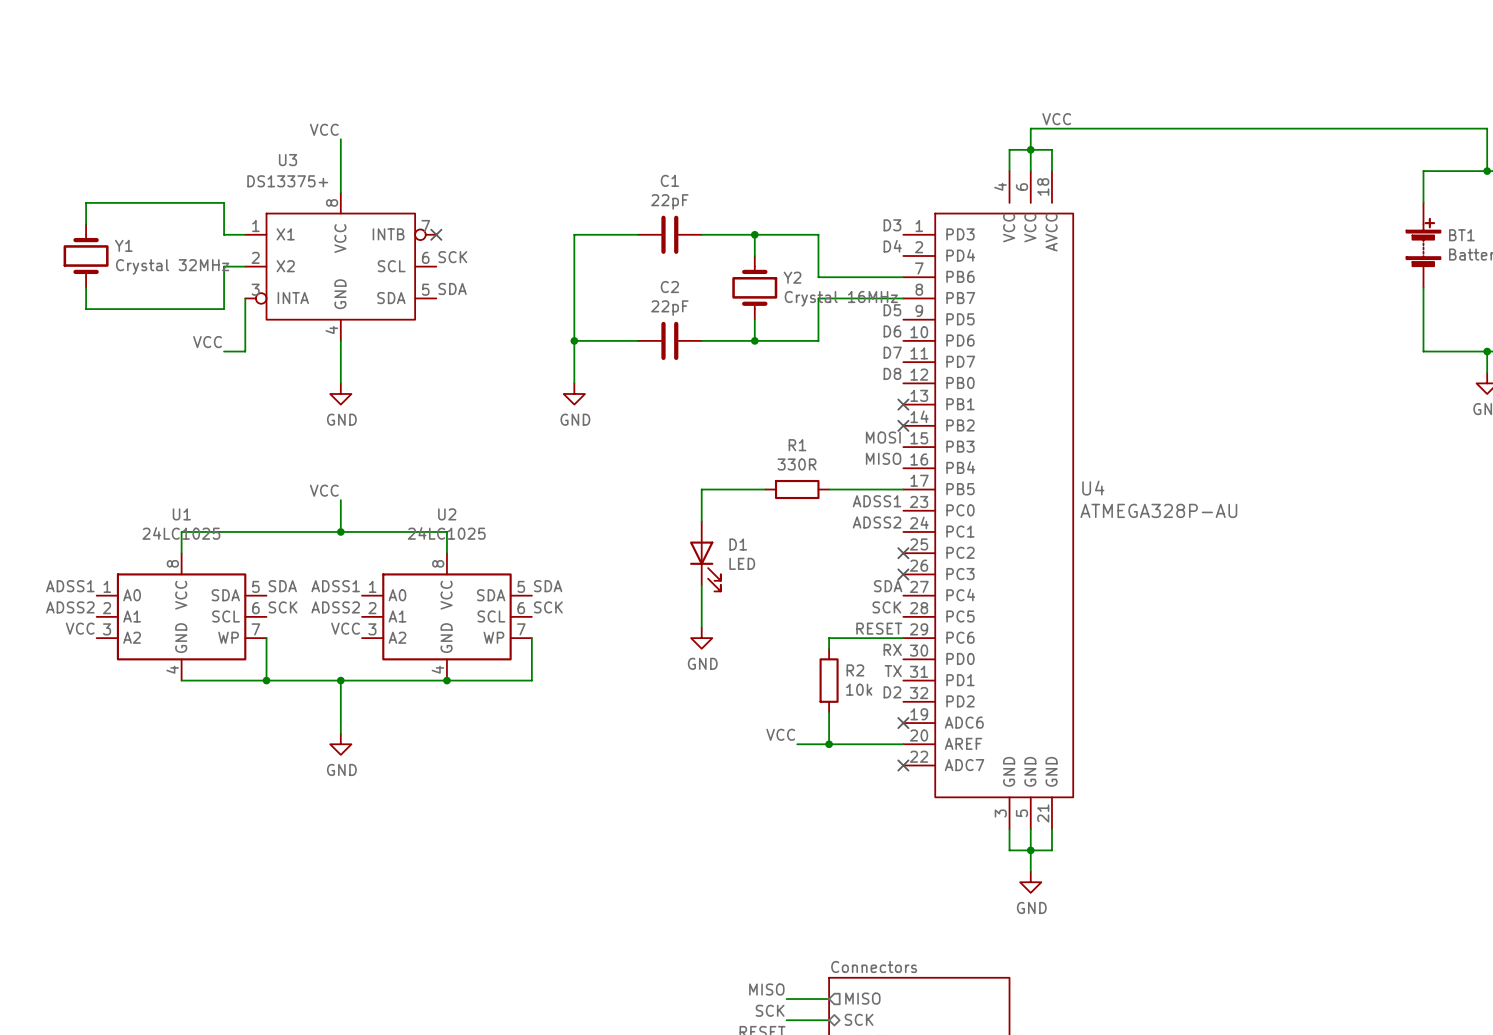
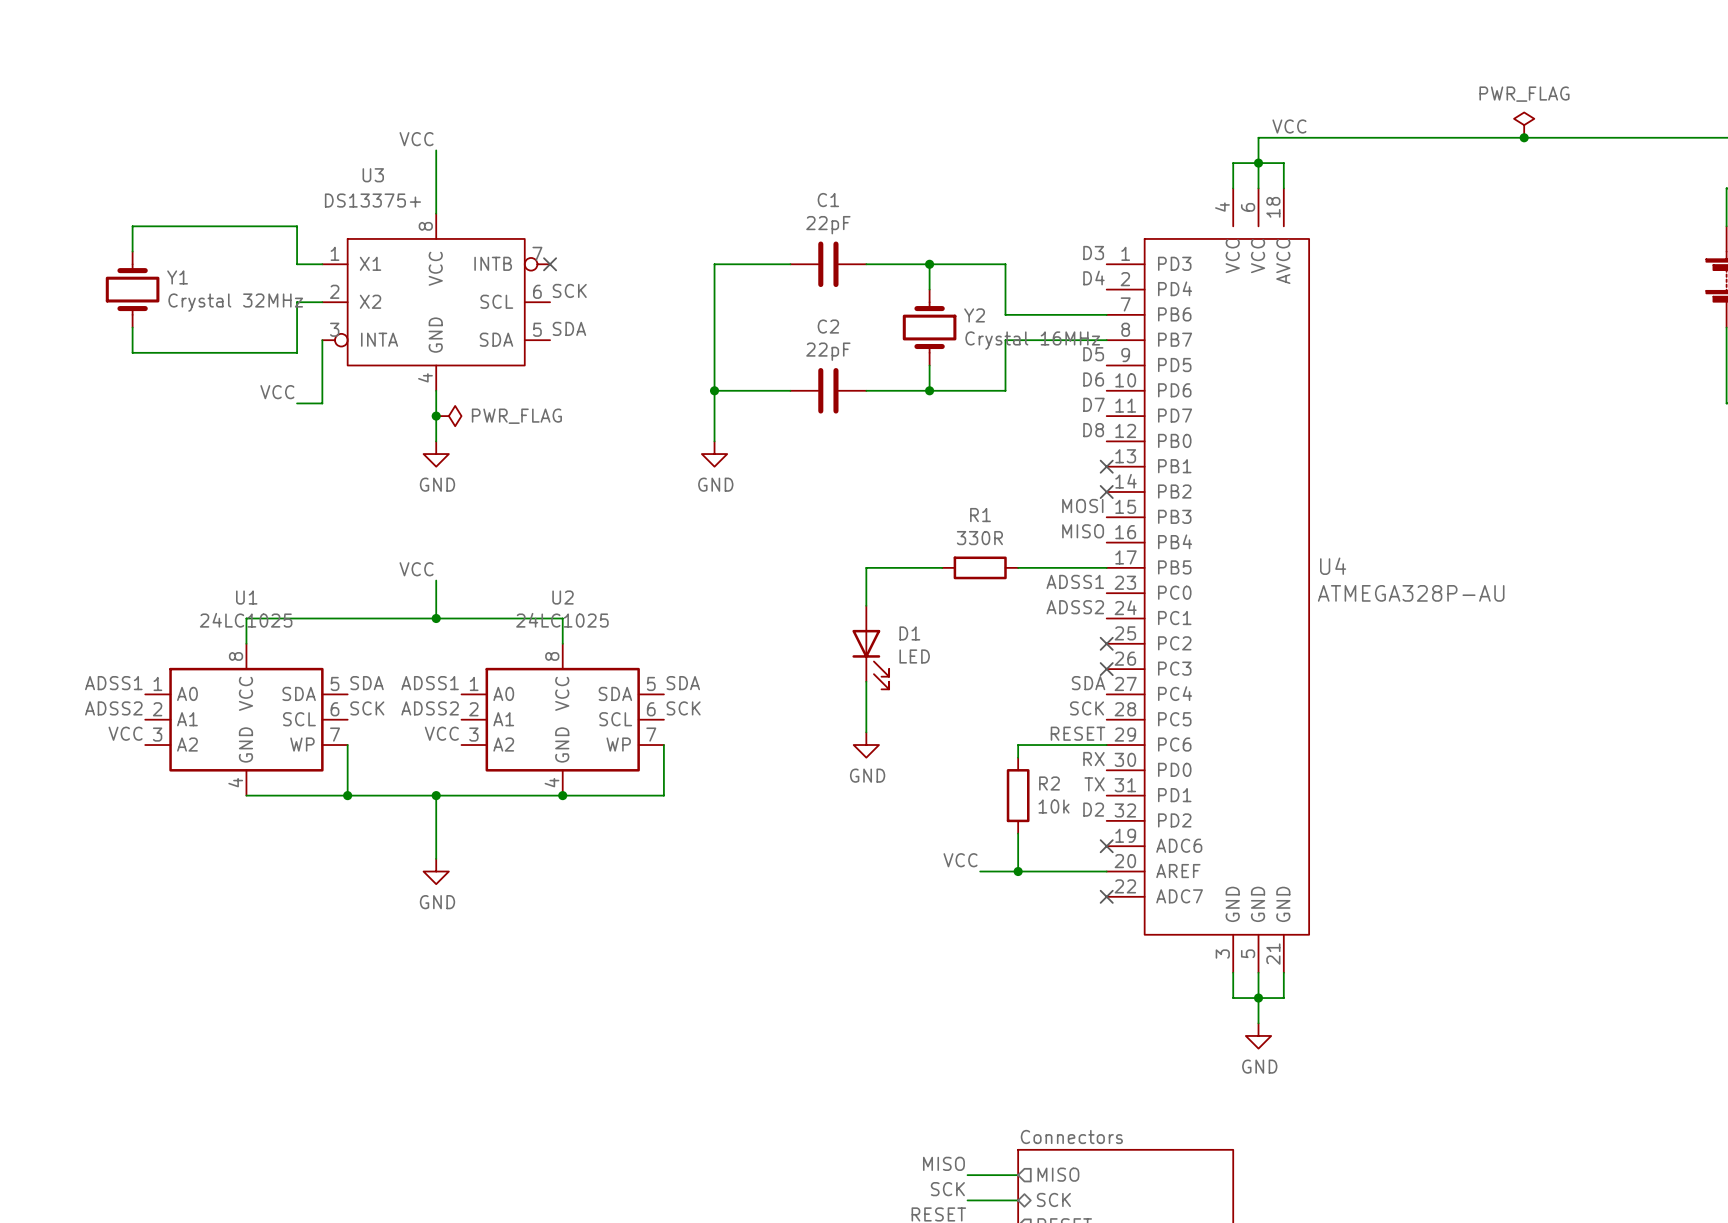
power symbol: none -> PWR_FLAG (1524, 125)
junction: none -> (1524, 137)
junction: none -> (436, 416)
power symbol: none -> PWR_FLAG (448, 416)

